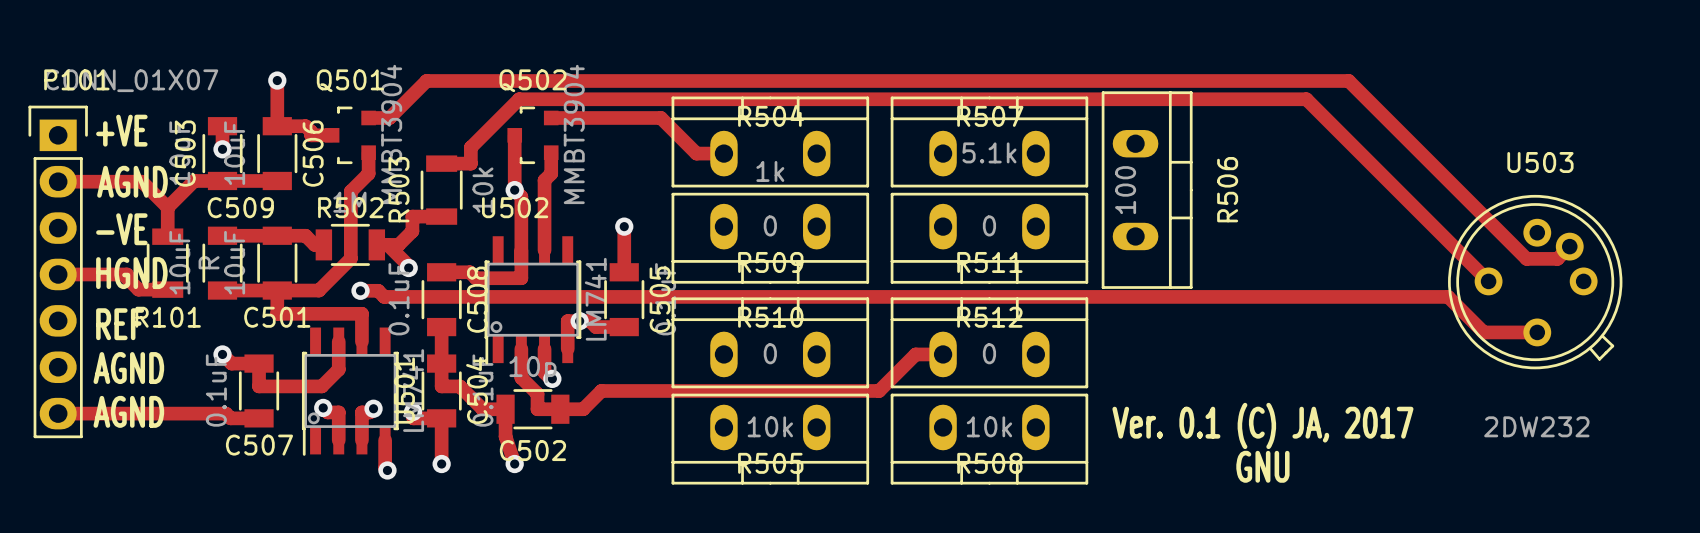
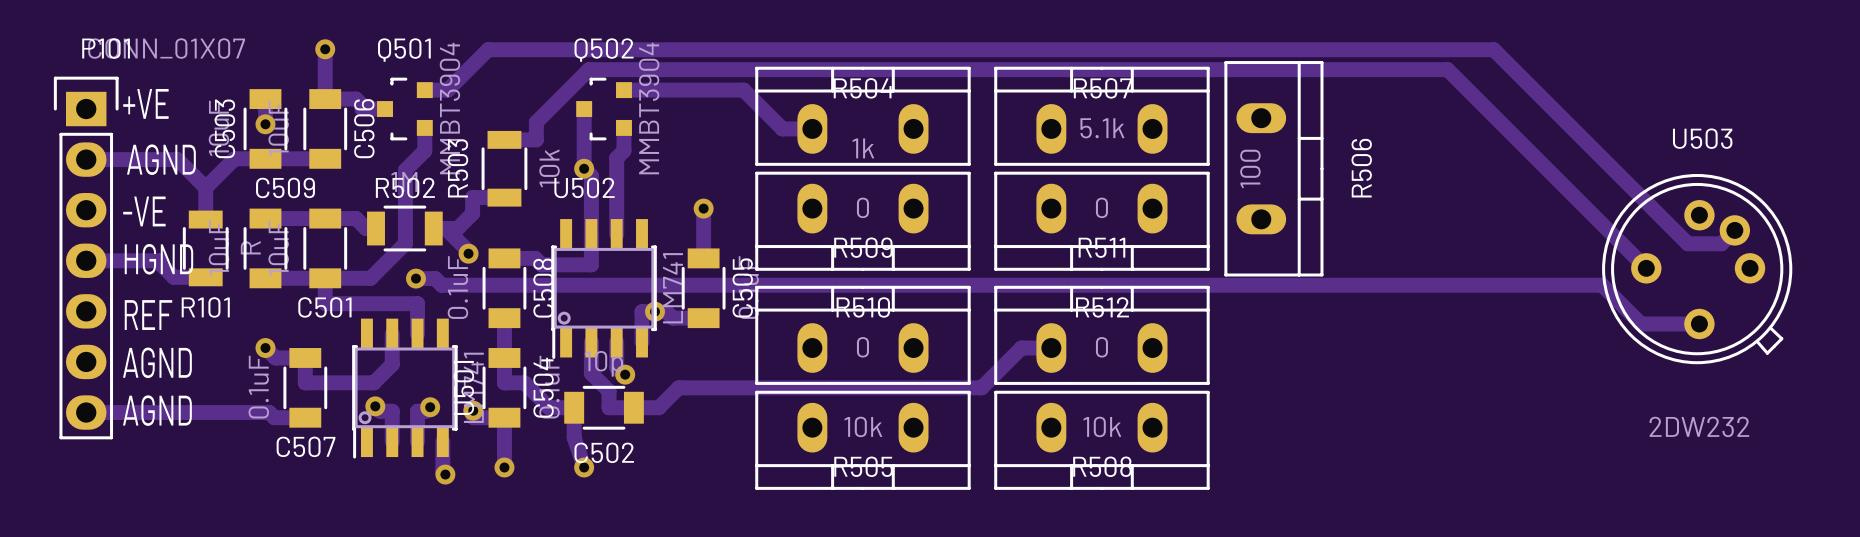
text: Ver. 0.1 (C) JA, 2017 (1262, 425) -> none
text: GNU (1262, 466) -> none

